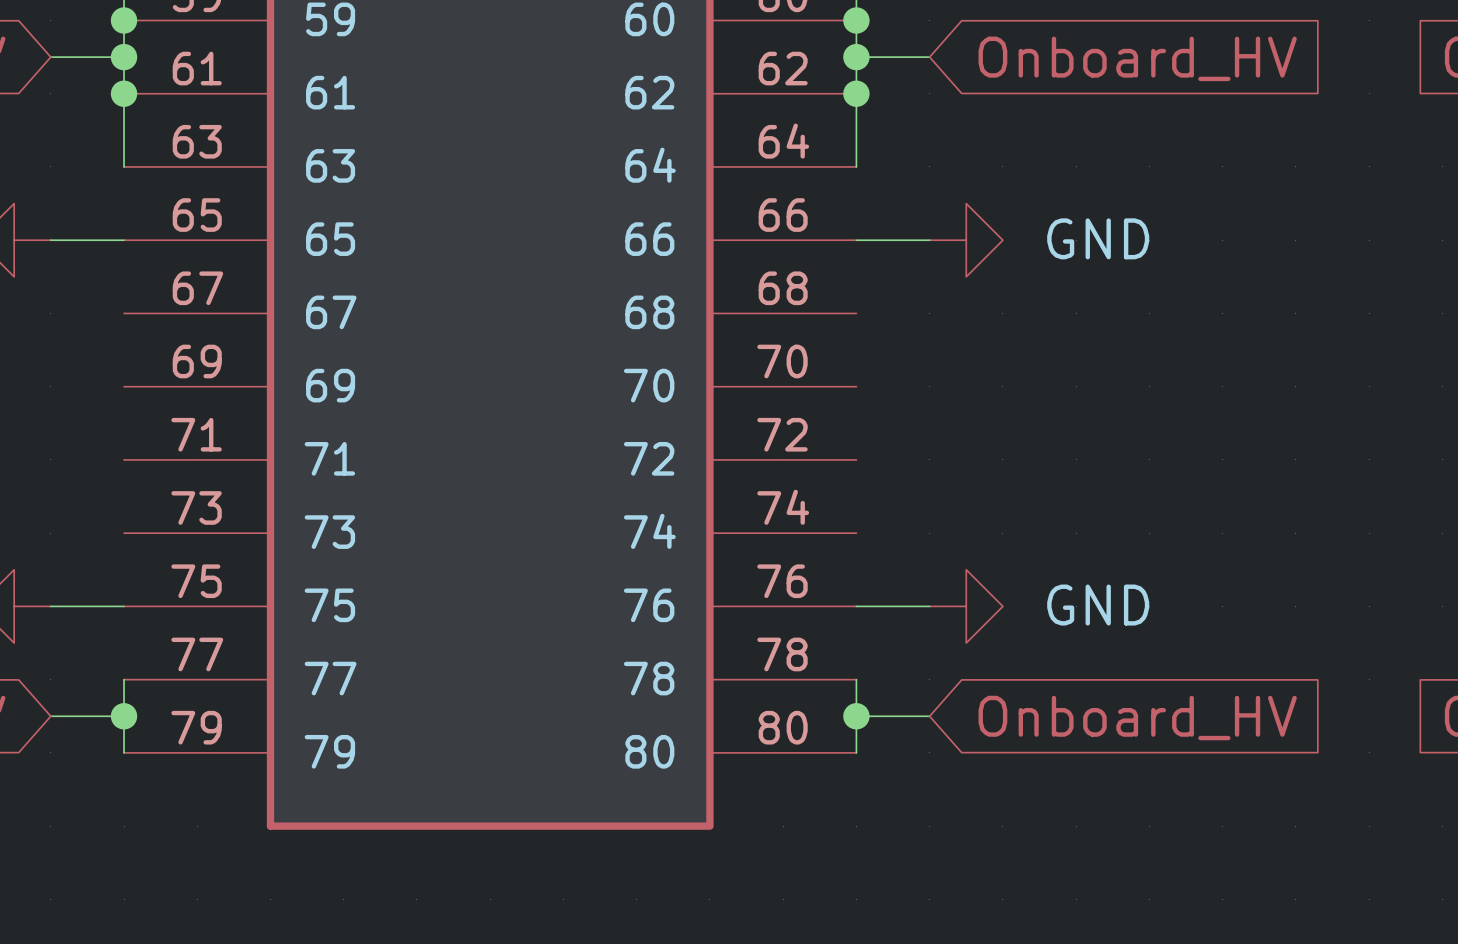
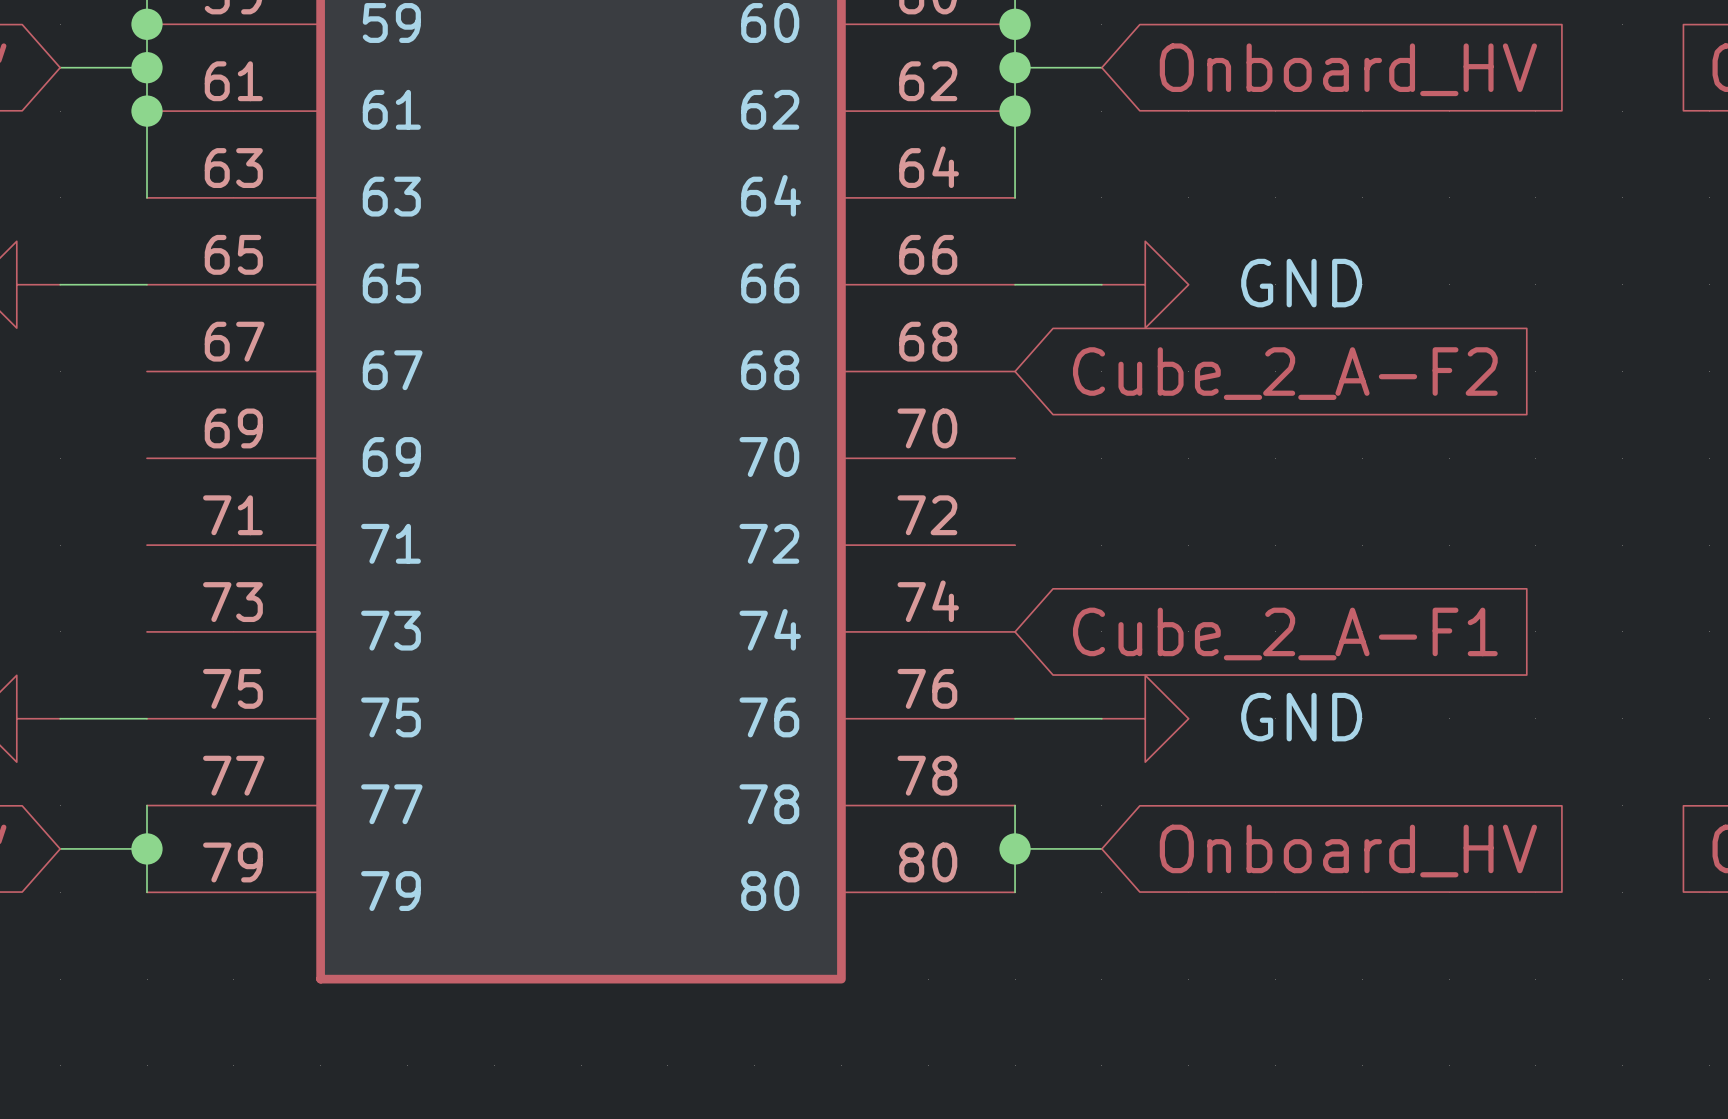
global label: none -> Cube_2_A-F2 (1285, 373)
global label: none -> Cube_2_A-F1 (1285, 633)

